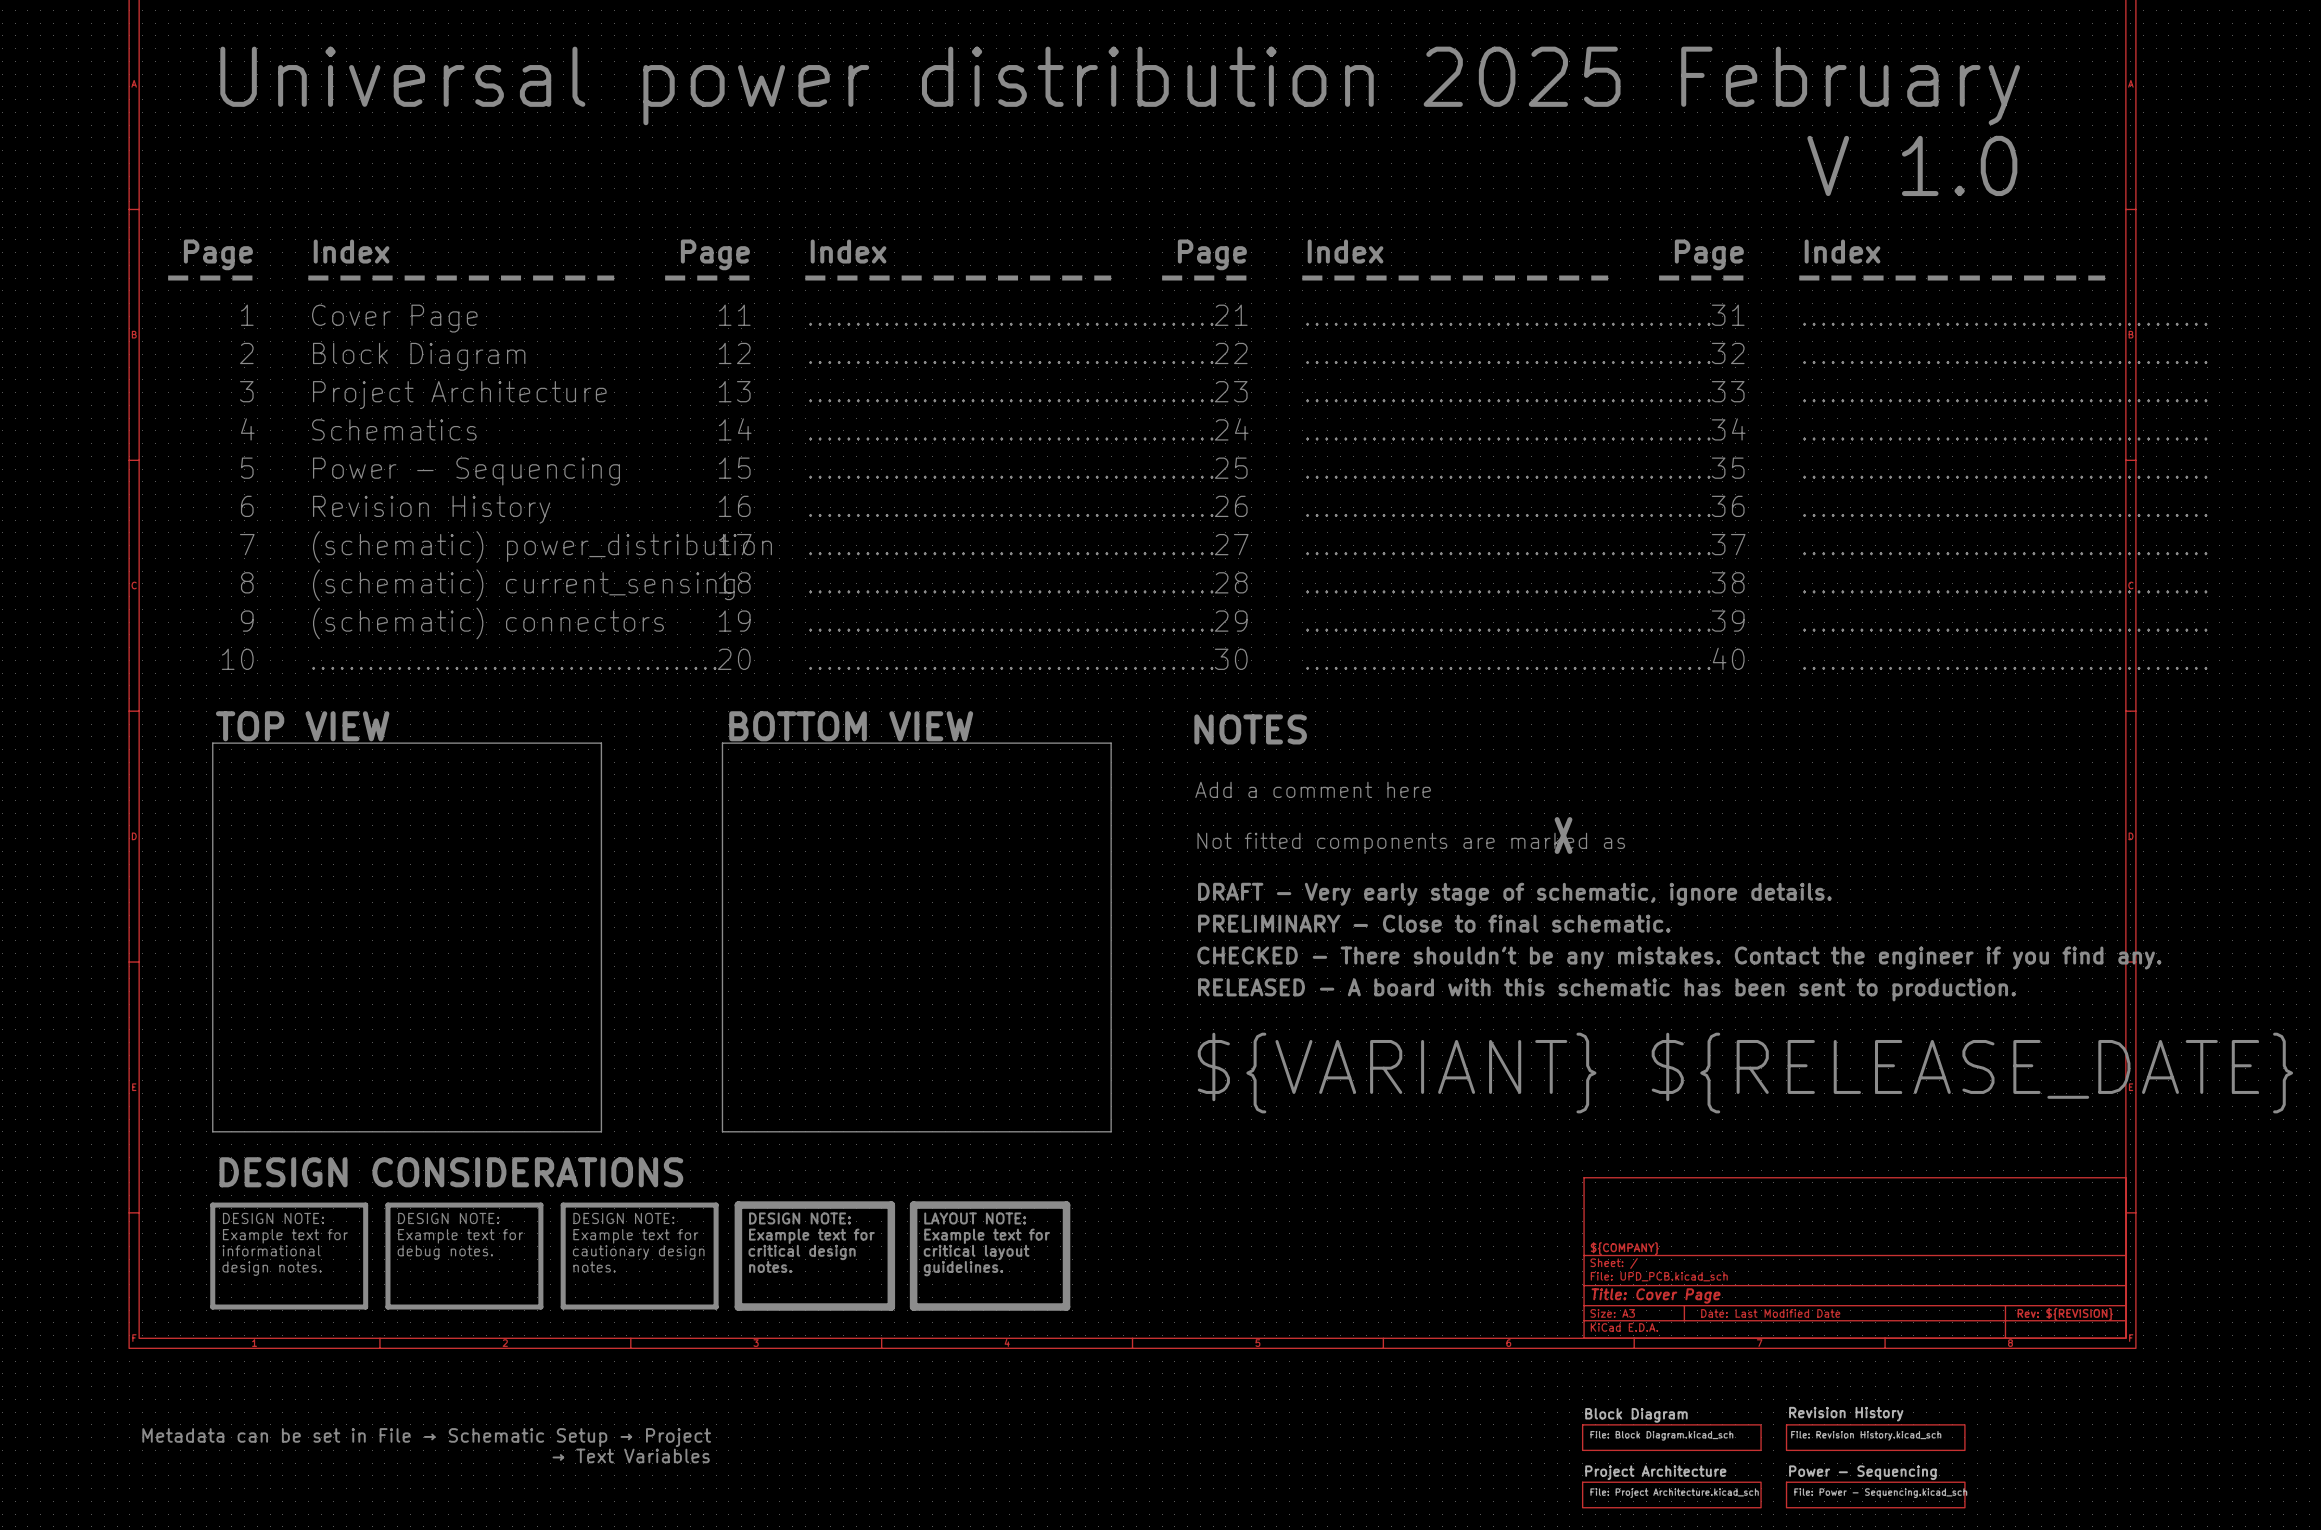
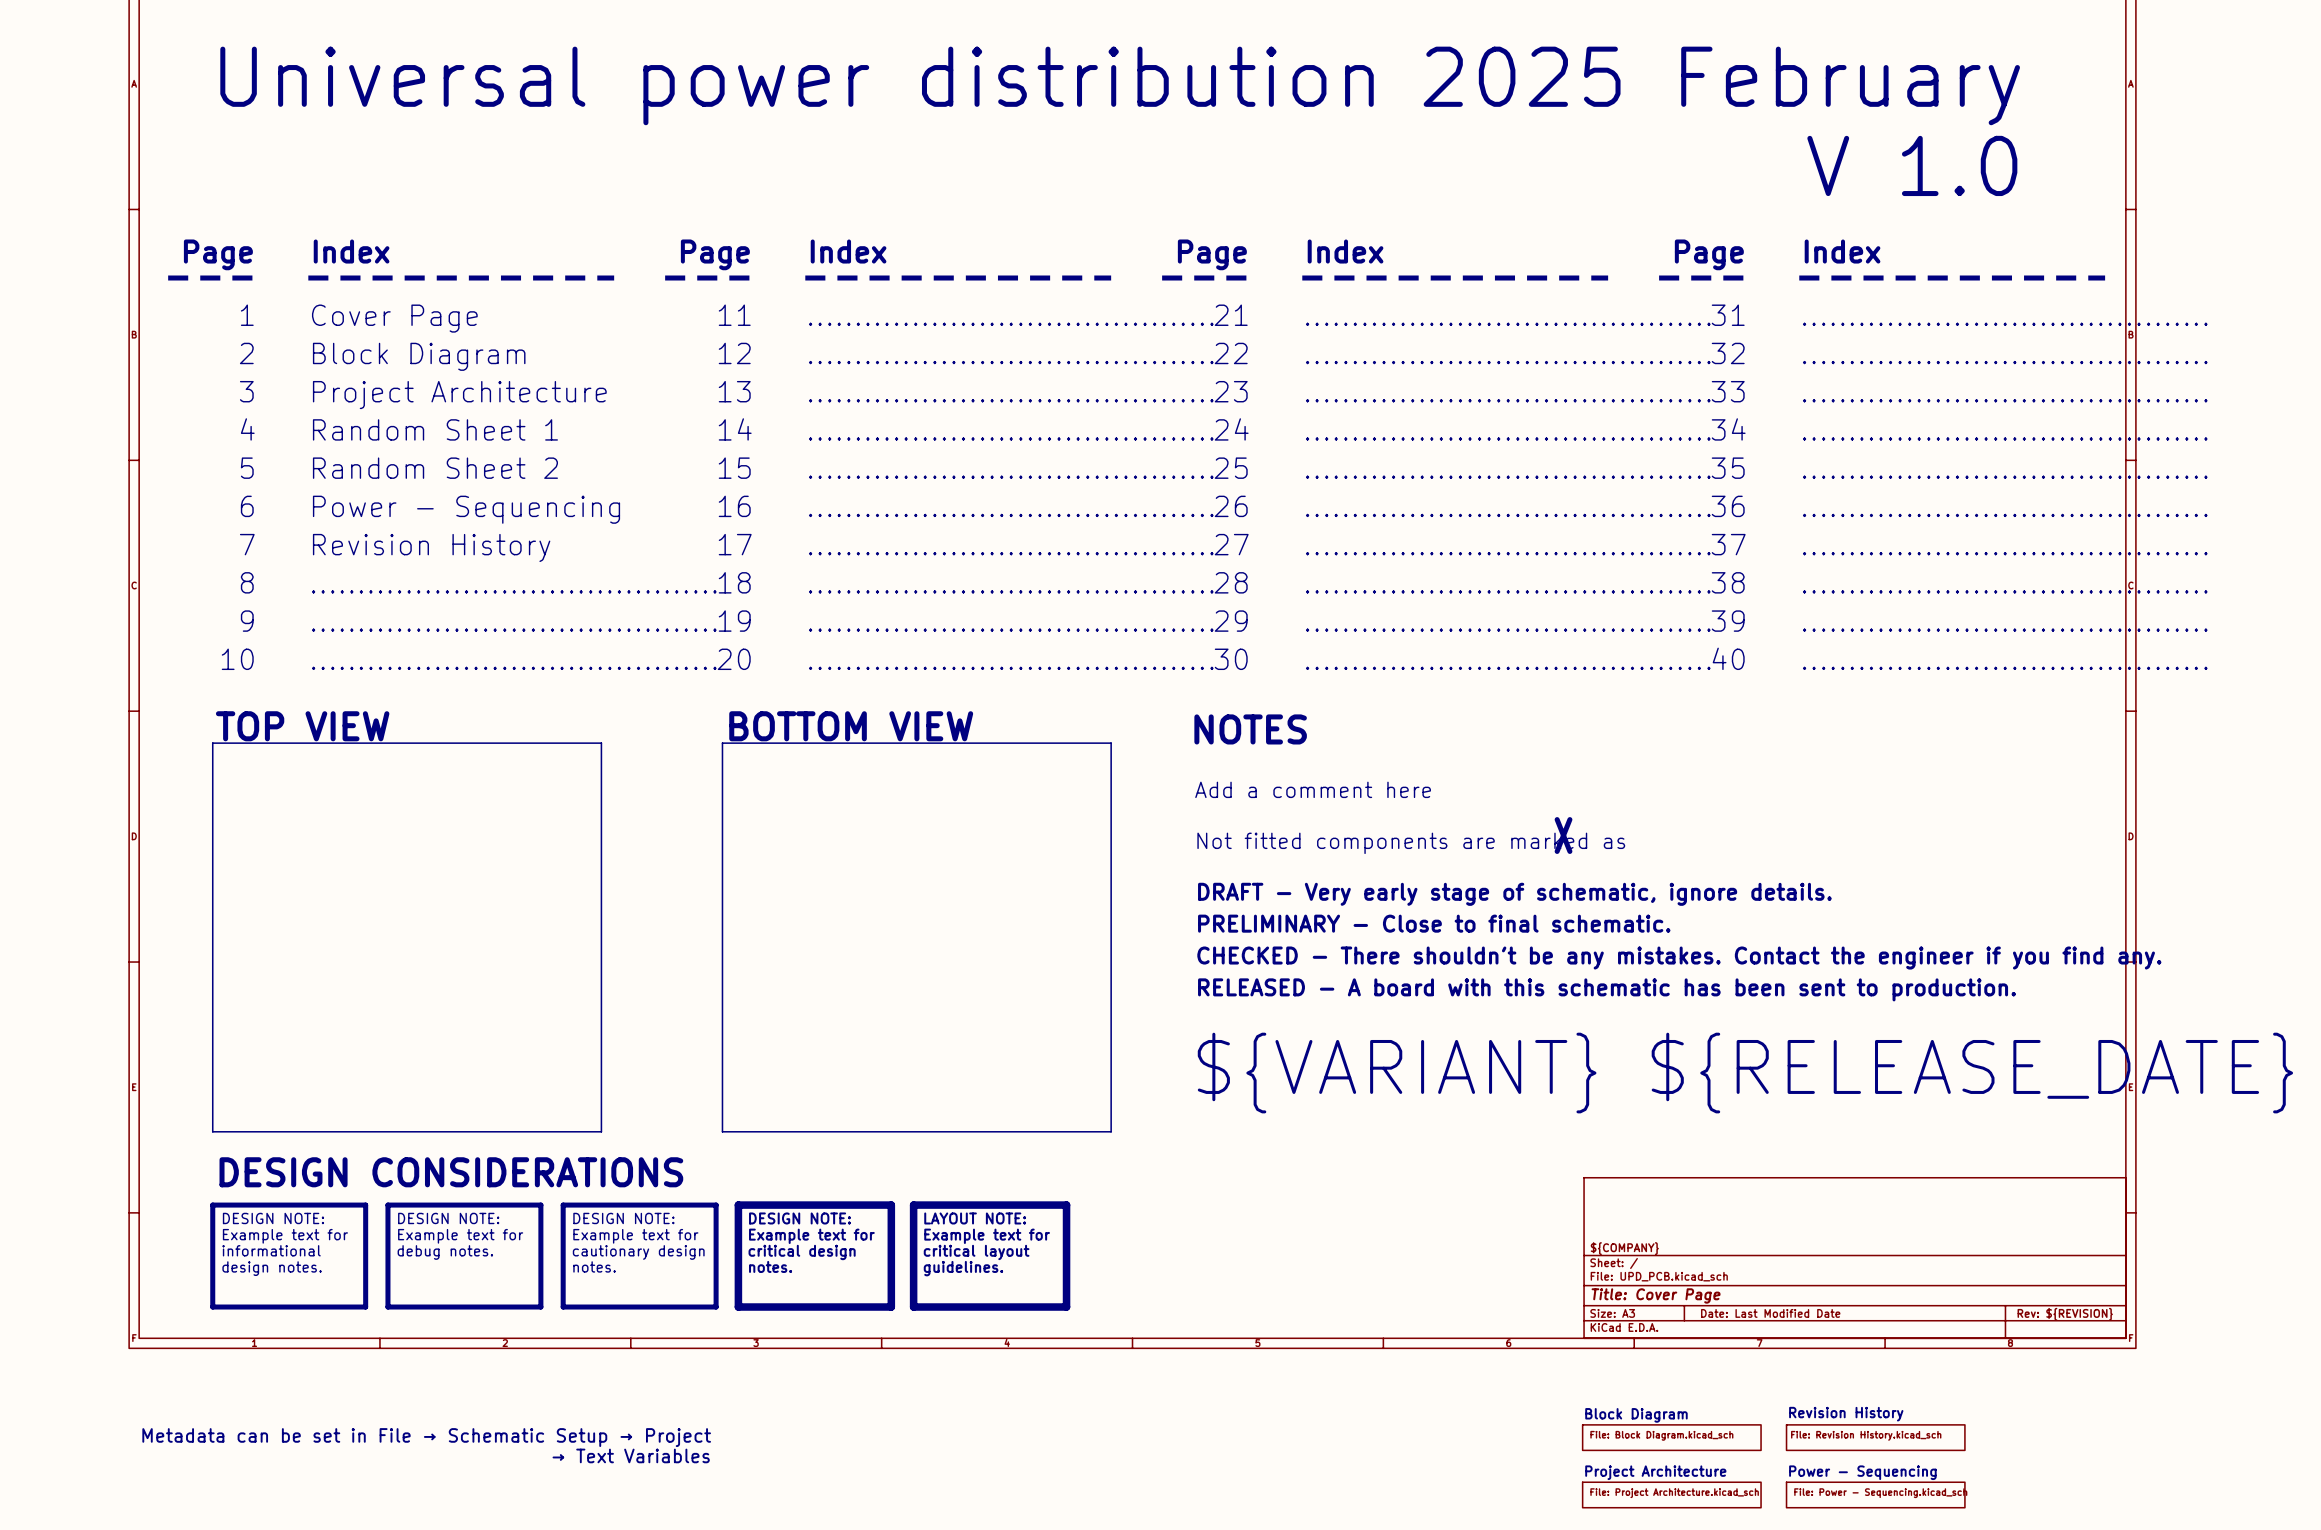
text: Schematics (394, 429) -> Random Sheet 1 (435, 429)
text: Power - Sequencing (466, 471) -> Random Sheet 2 (435, 468)
text: Revision History (431, 509) -> Power - Sequencing (466, 509)
text: (schematic) power_distribution (542, 547) -> Revision History (431, 547)
text: (schematic) current_sensing (523, 585) -> ........................................... (514, 591)
text: (schematic) connectors (488, 623) -> ........................................... (514, 630)

